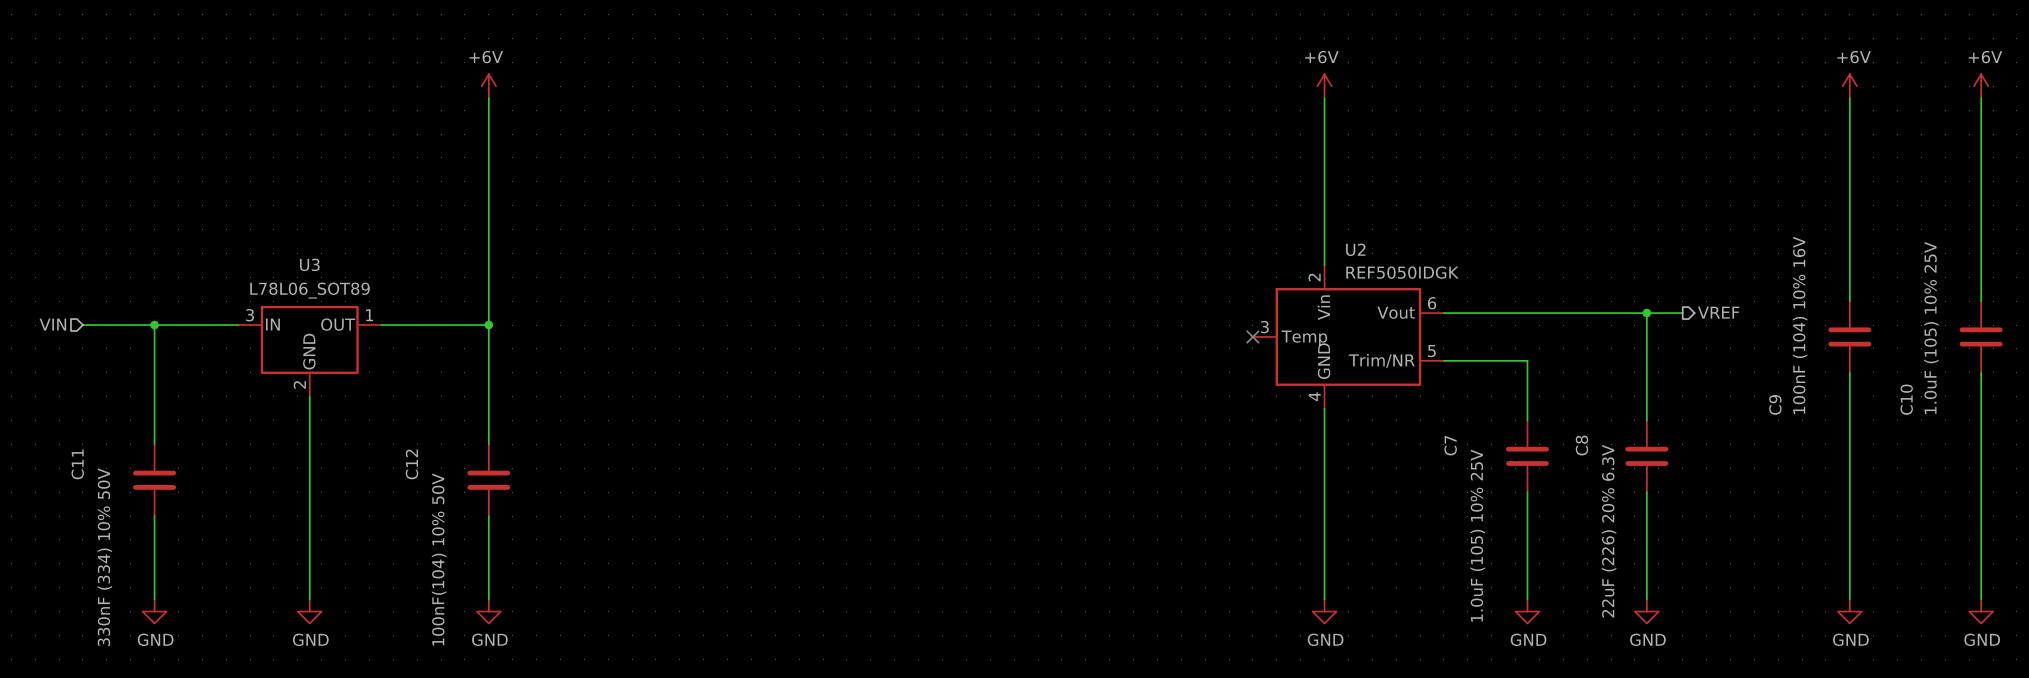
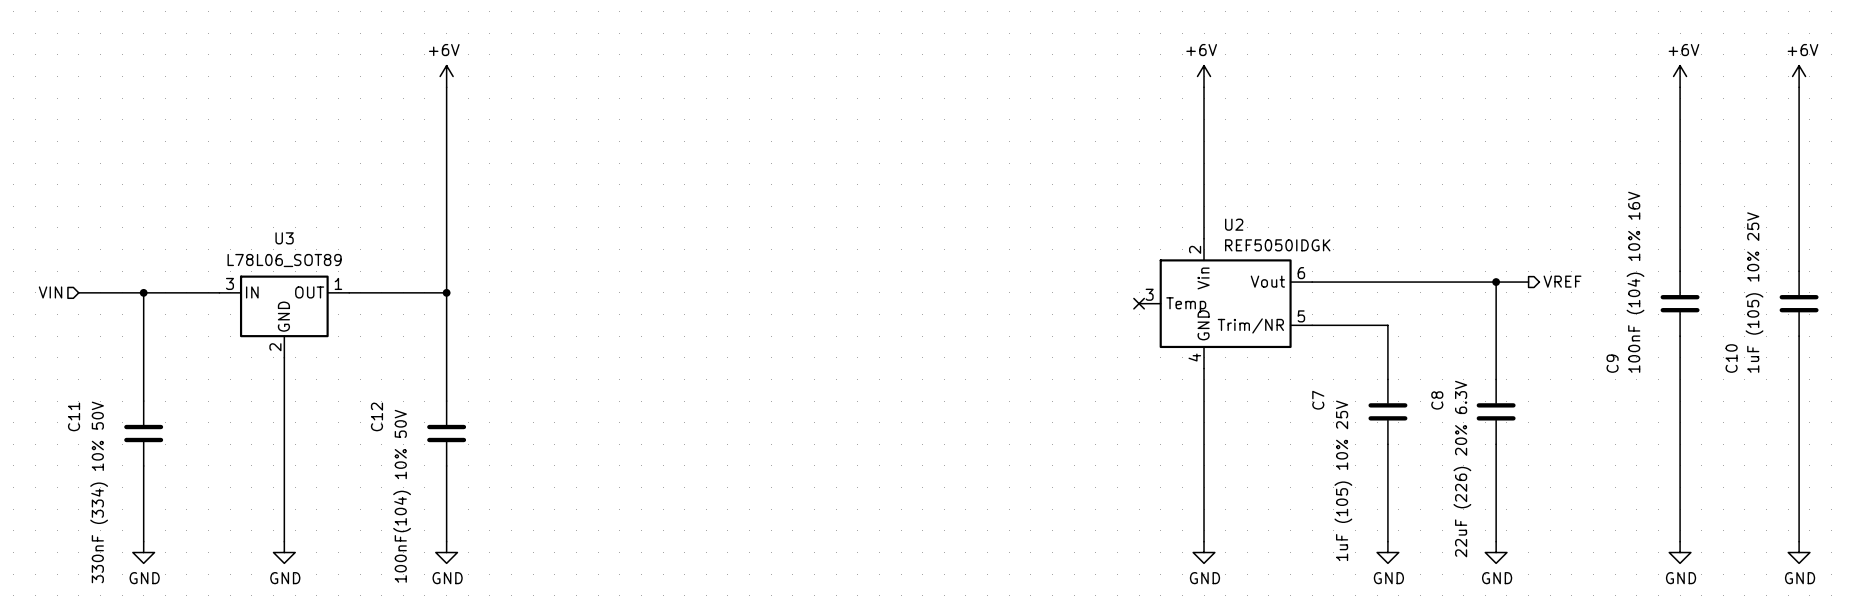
C10 value: 1.0uF (105) 10% 25V (1931, 327) -> 1uF (105) 10% 25V (1754, 292)
C7 value: 1.0uF (105) 10% 25V (1477, 535) -> 1uF (105) 10% 25V (1343, 480)

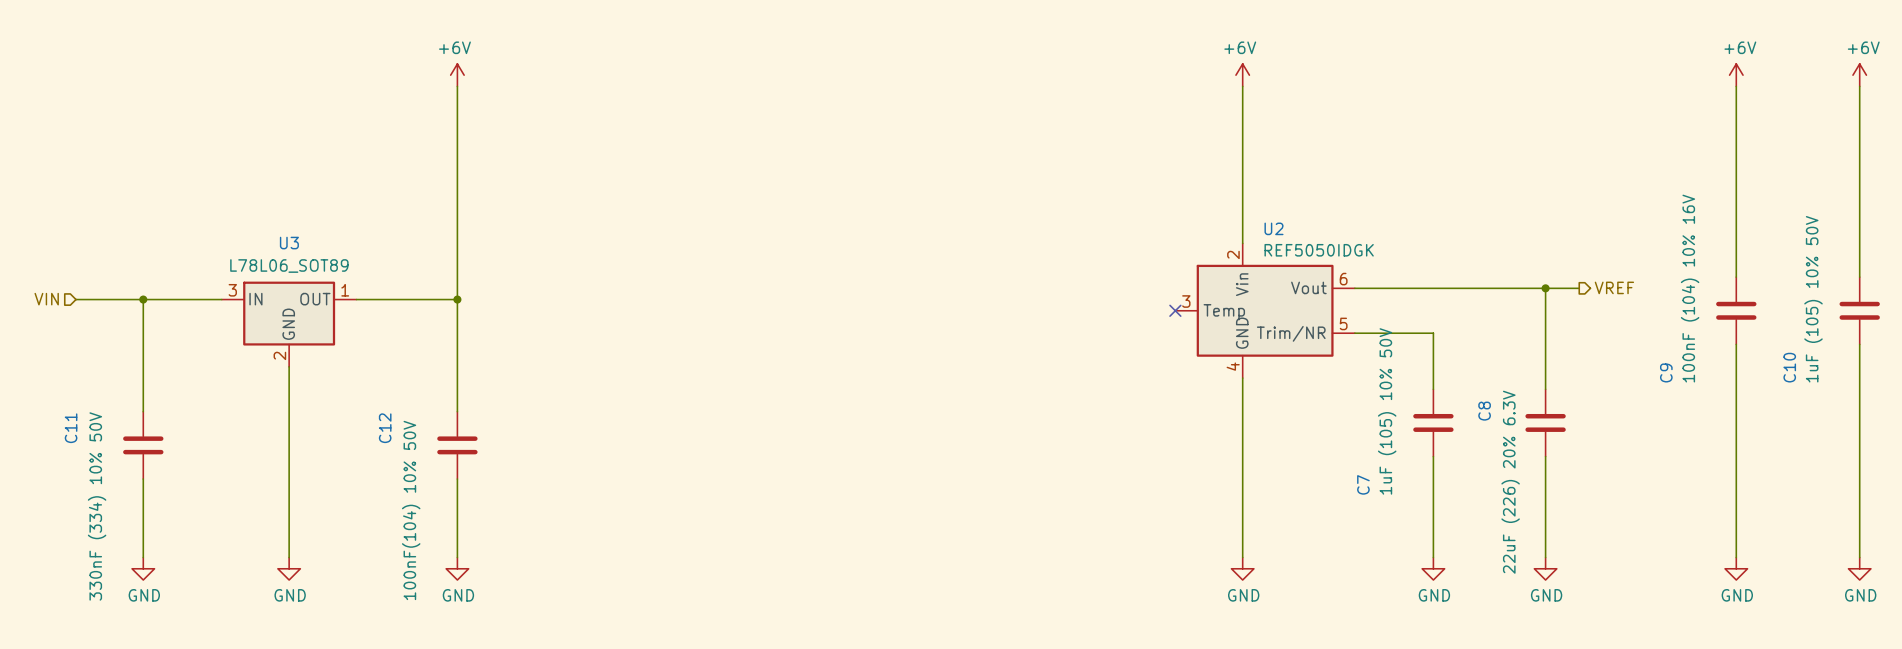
C10 value: 1uF (105) 10% 25V (1754, 292) -> 1uF (105) 10% 50V (1813, 299)
C7 name position: C7 (1318, 400) -> C7 (1363, 484)
C7 value: 1uF (105) 10% 25V (1343, 480) -> 1uF (105) 10% 50V (1387, 411)

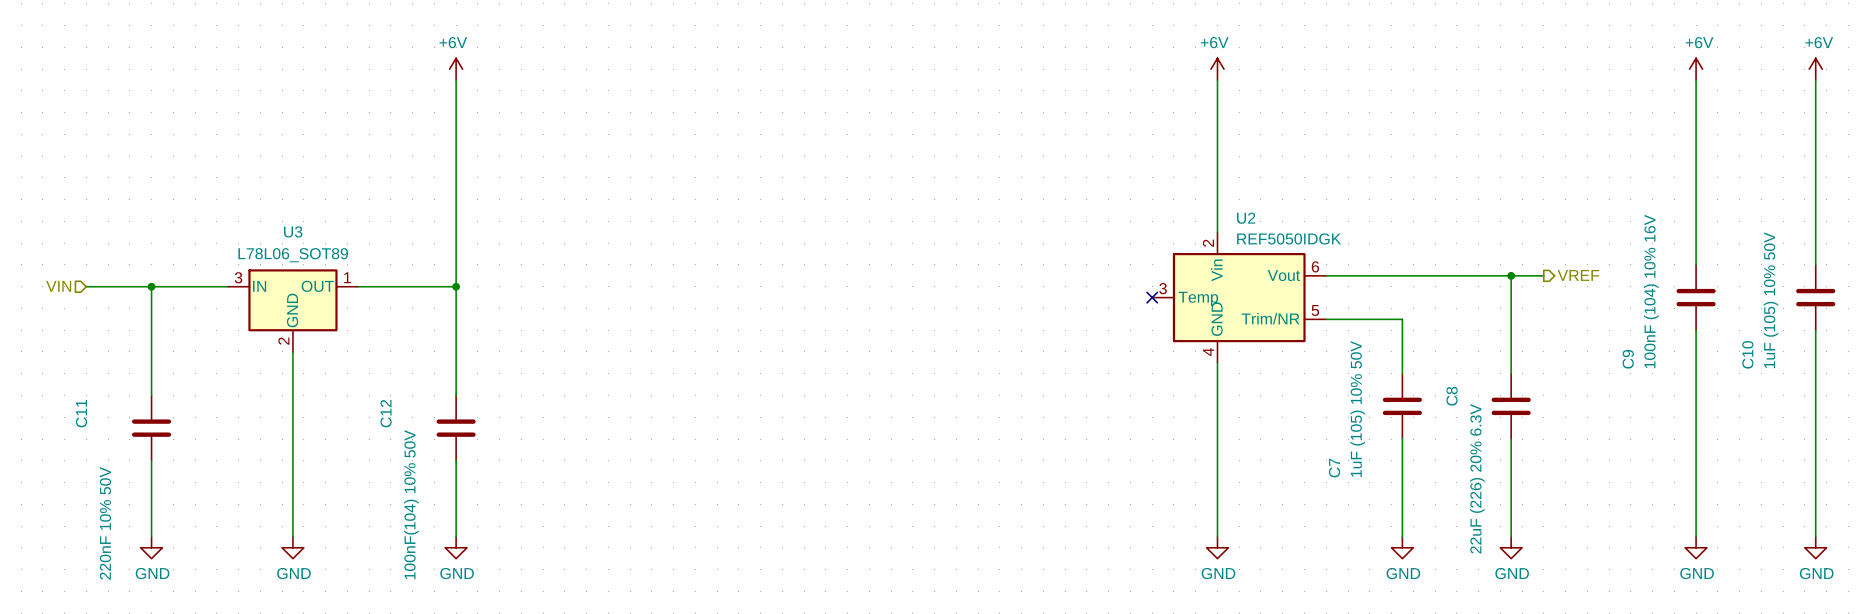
C11 value: 330nF (334) 10% 50V (97, 506) -> 220nF 10% 50V (105, 523)

